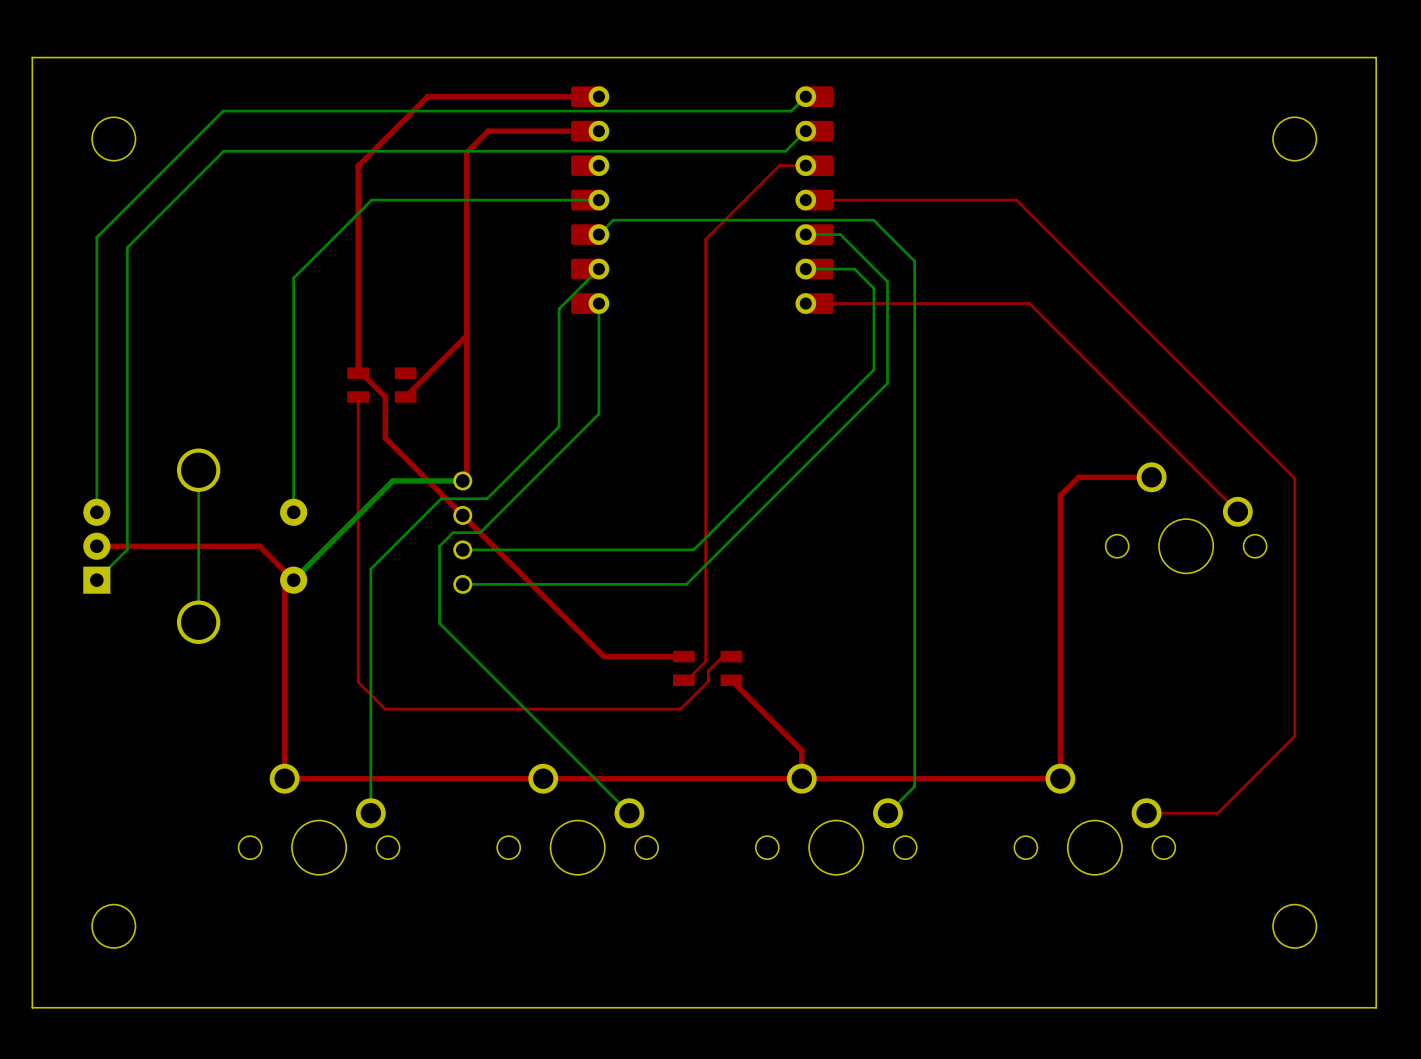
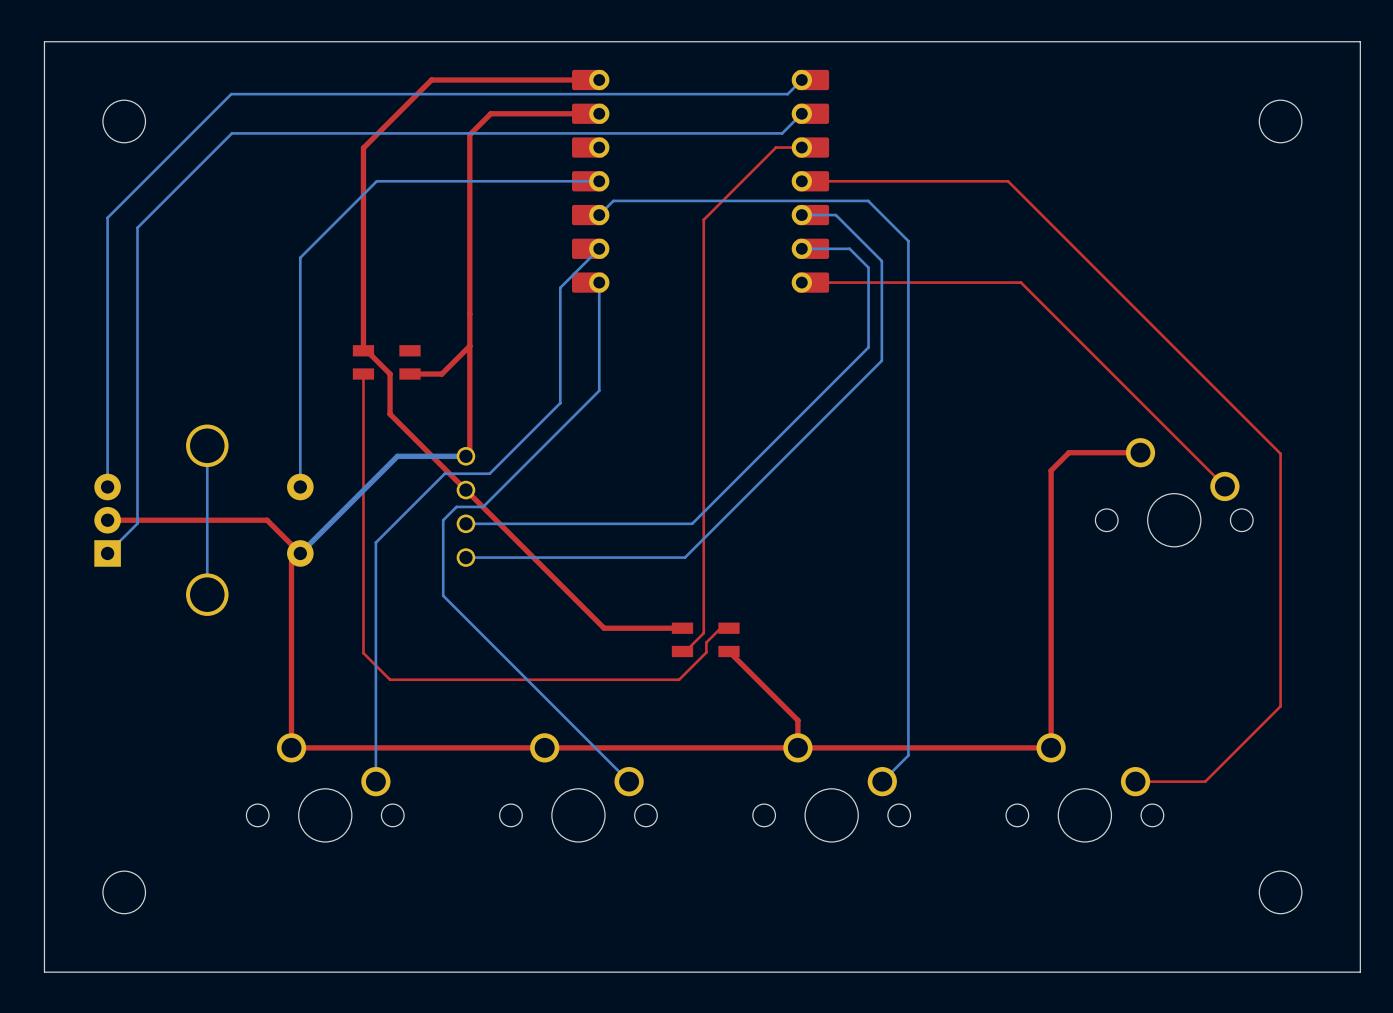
top track: (466, 335) (405, 396) -> (469, 346) (441, 374) (409, 374)

